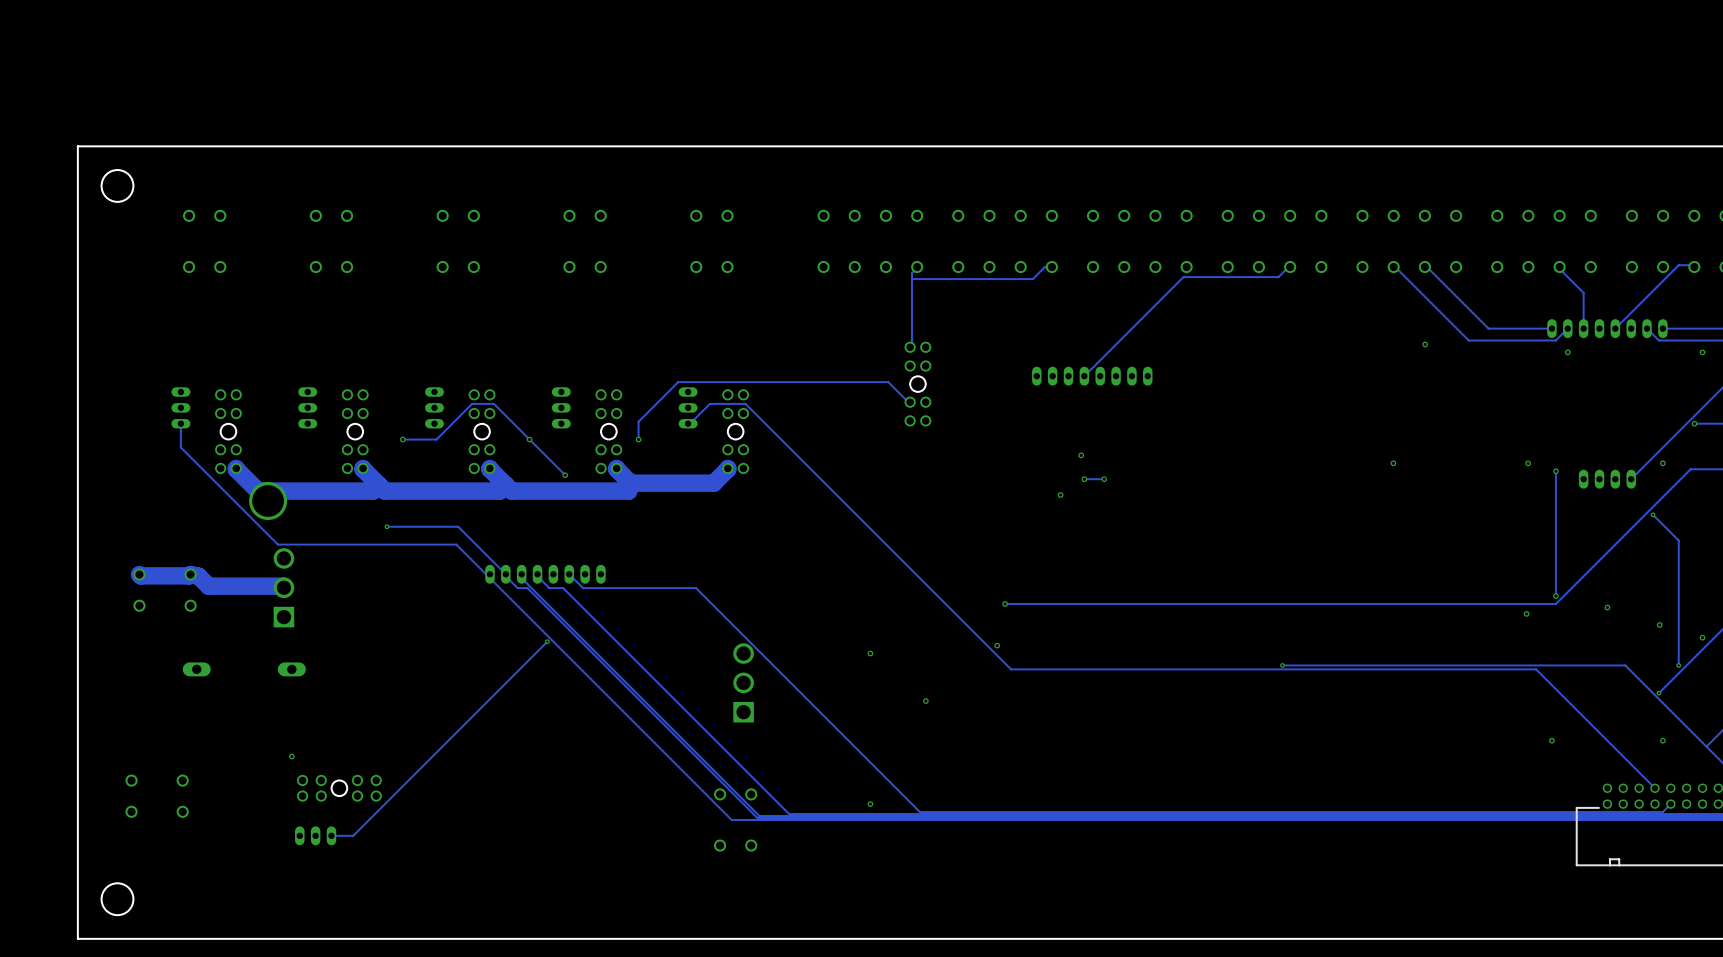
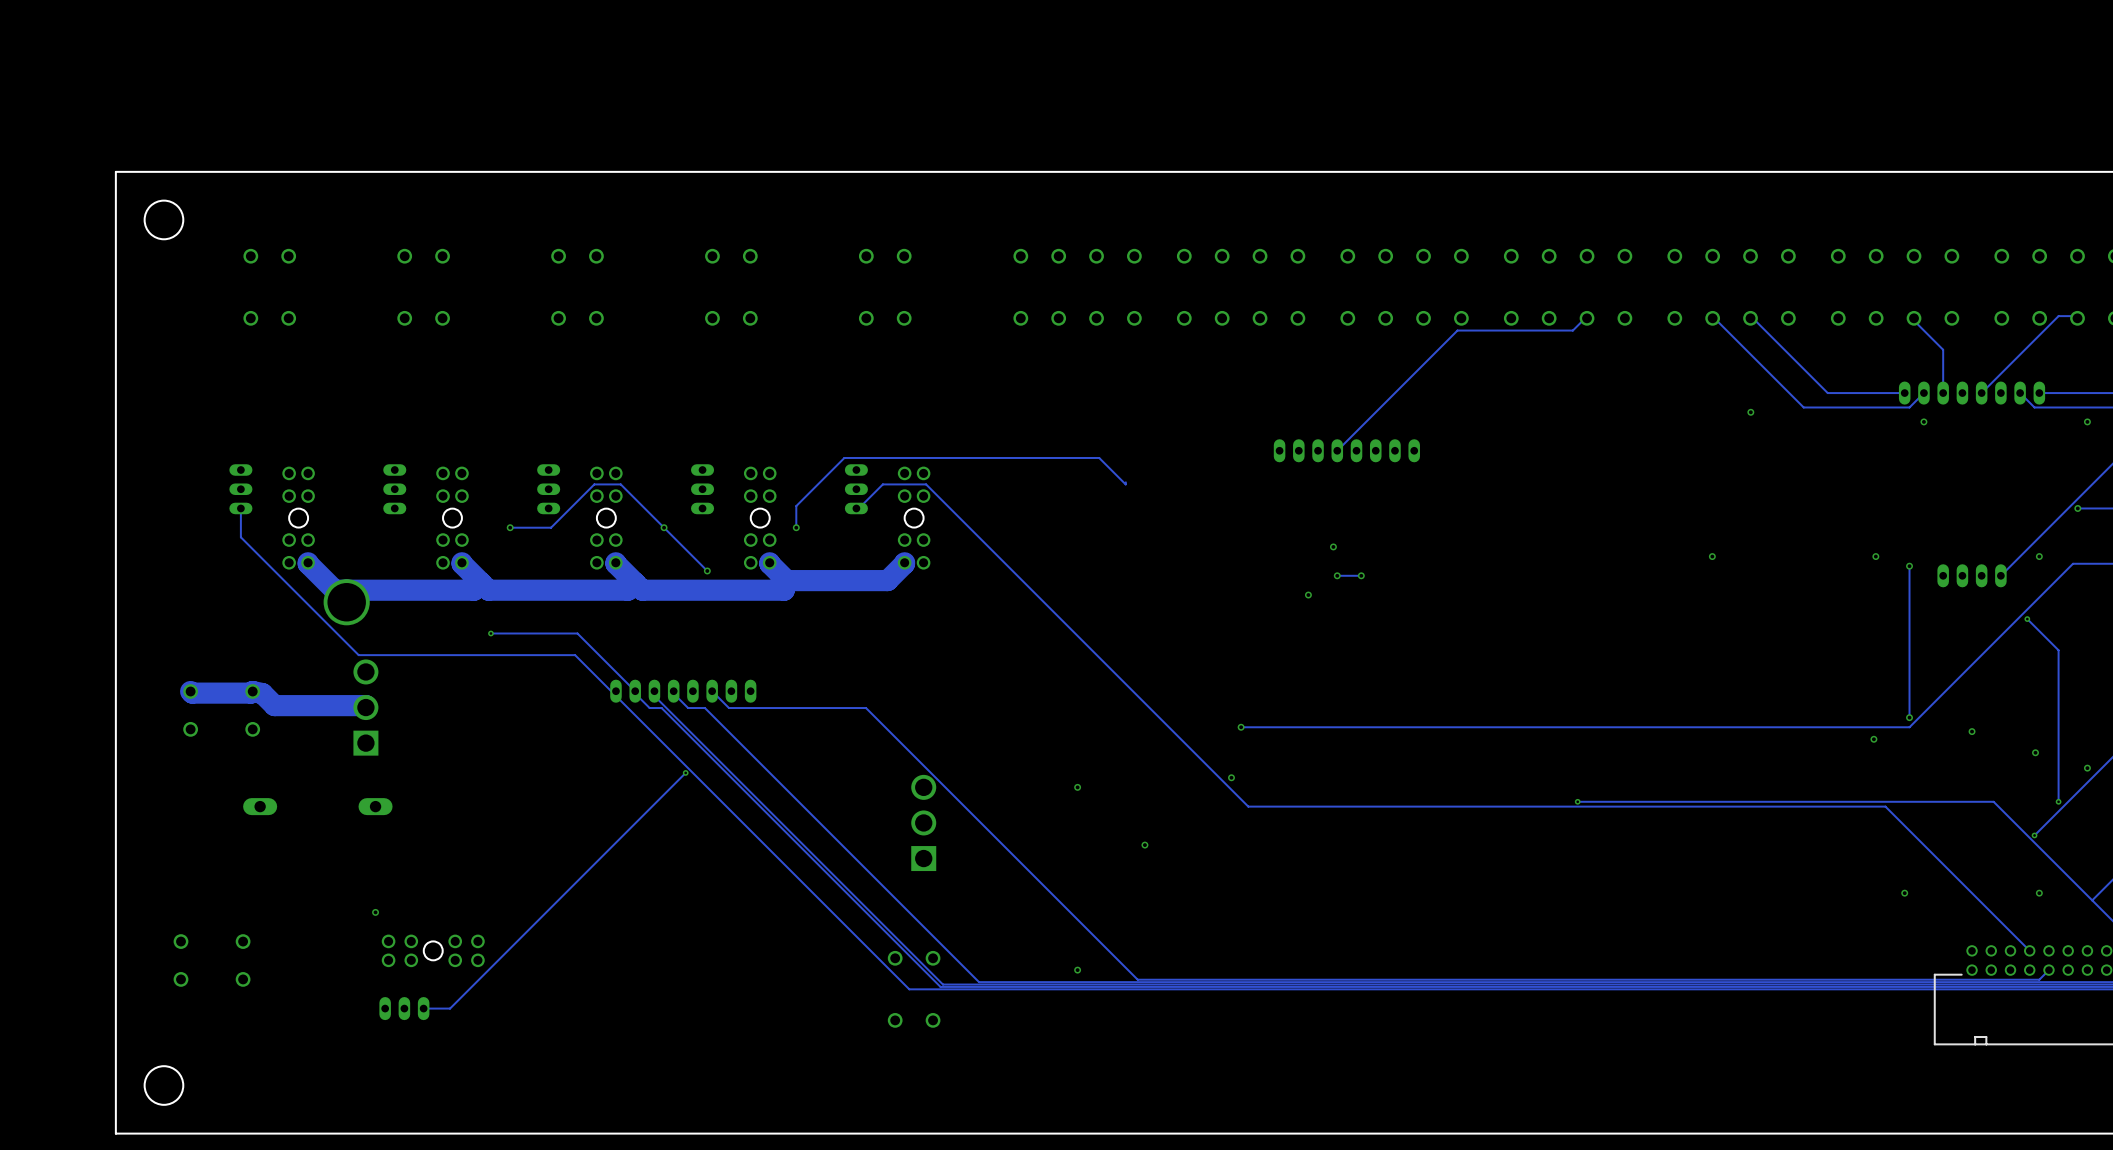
track: (917, 267) (911, 273) (911, 346) (910, 347) -> none
track: (1051, 267) (1044, 267) (1032, 279) (911, 279) -> none
part: (917, 384) -> none

